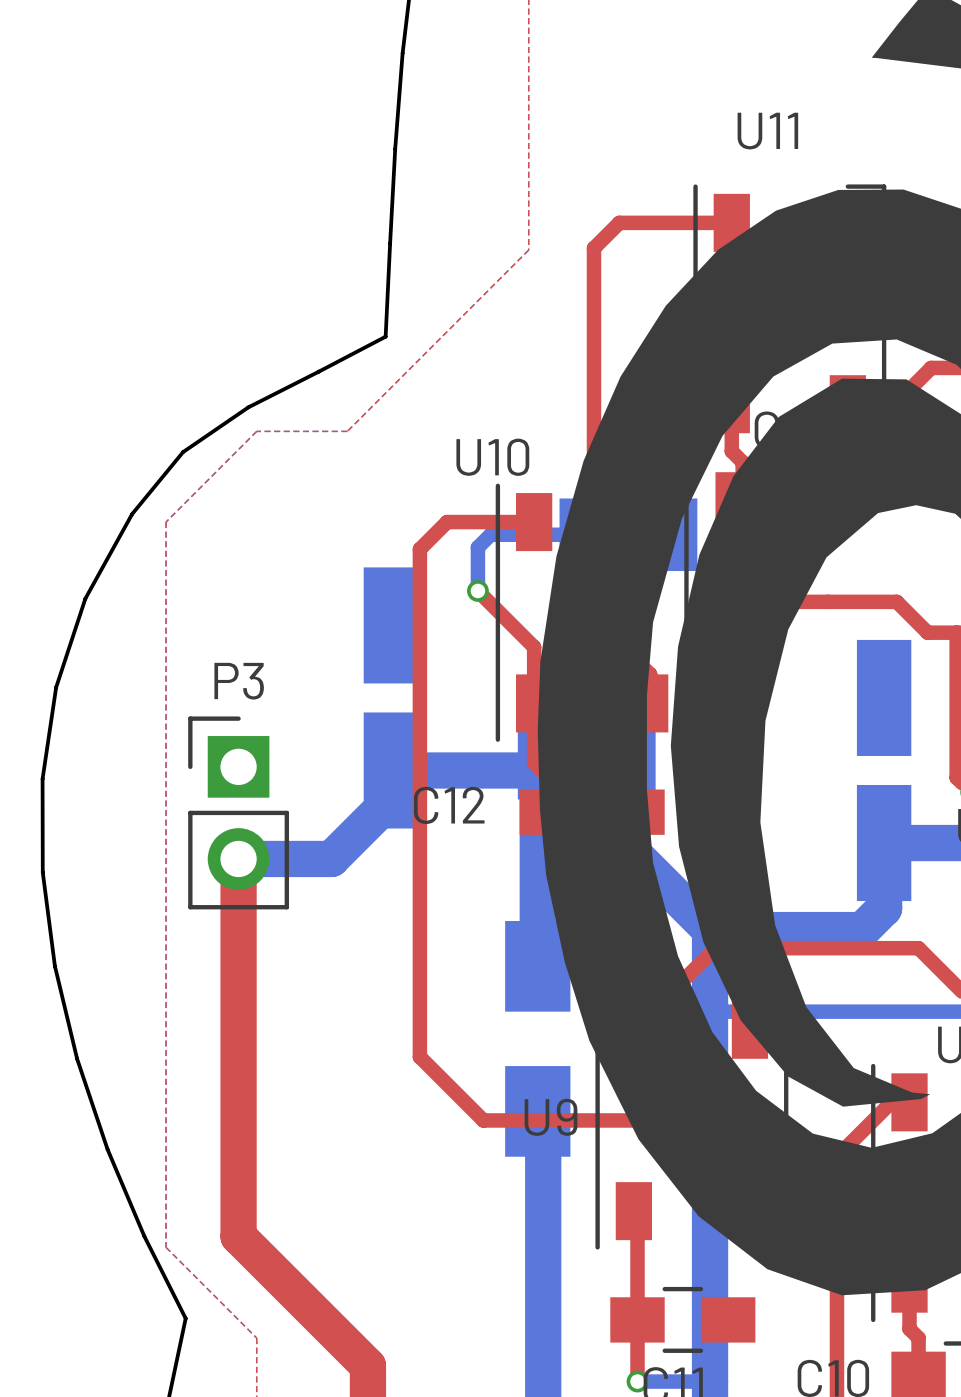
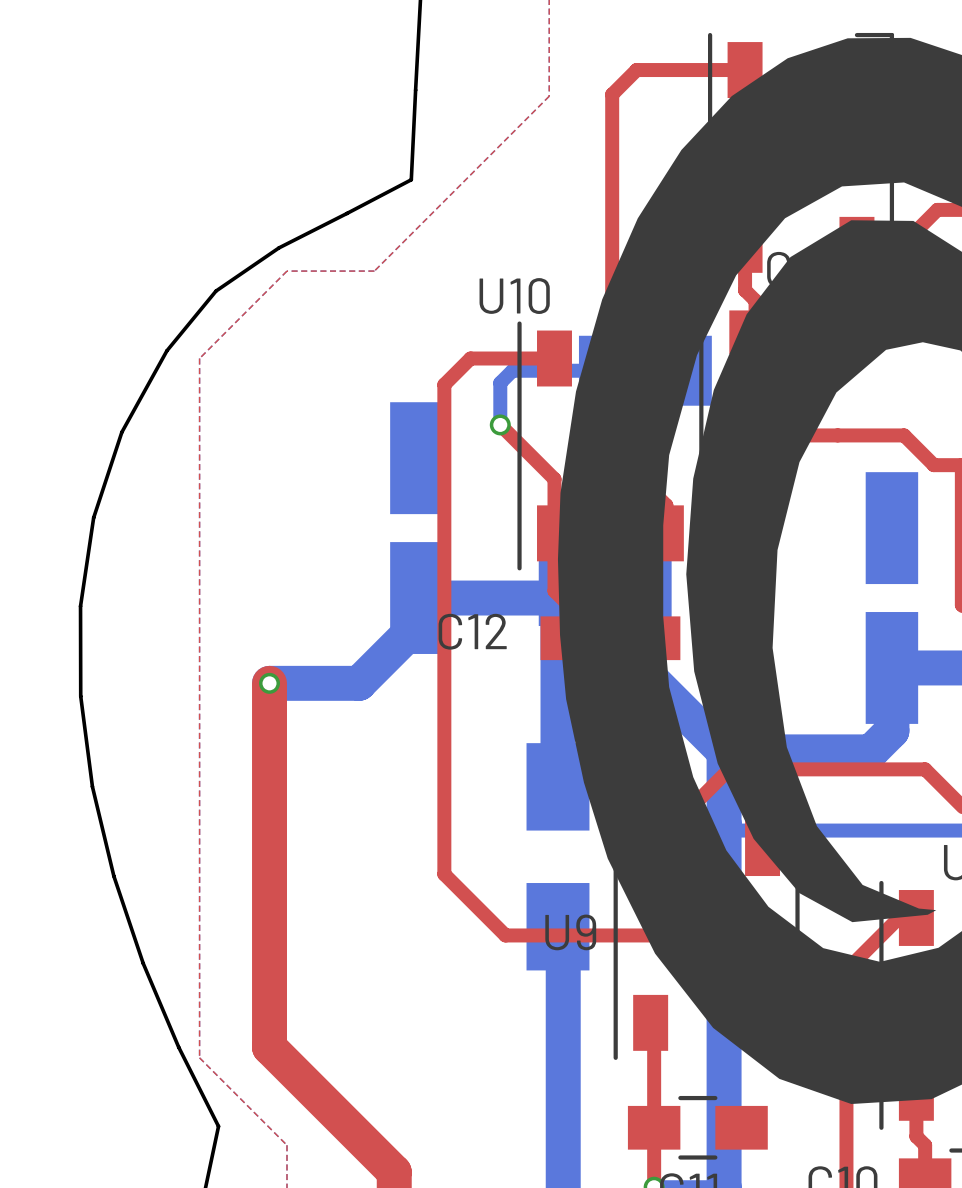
P3: (238, 812) -> none
via: none -> (269, 683)

